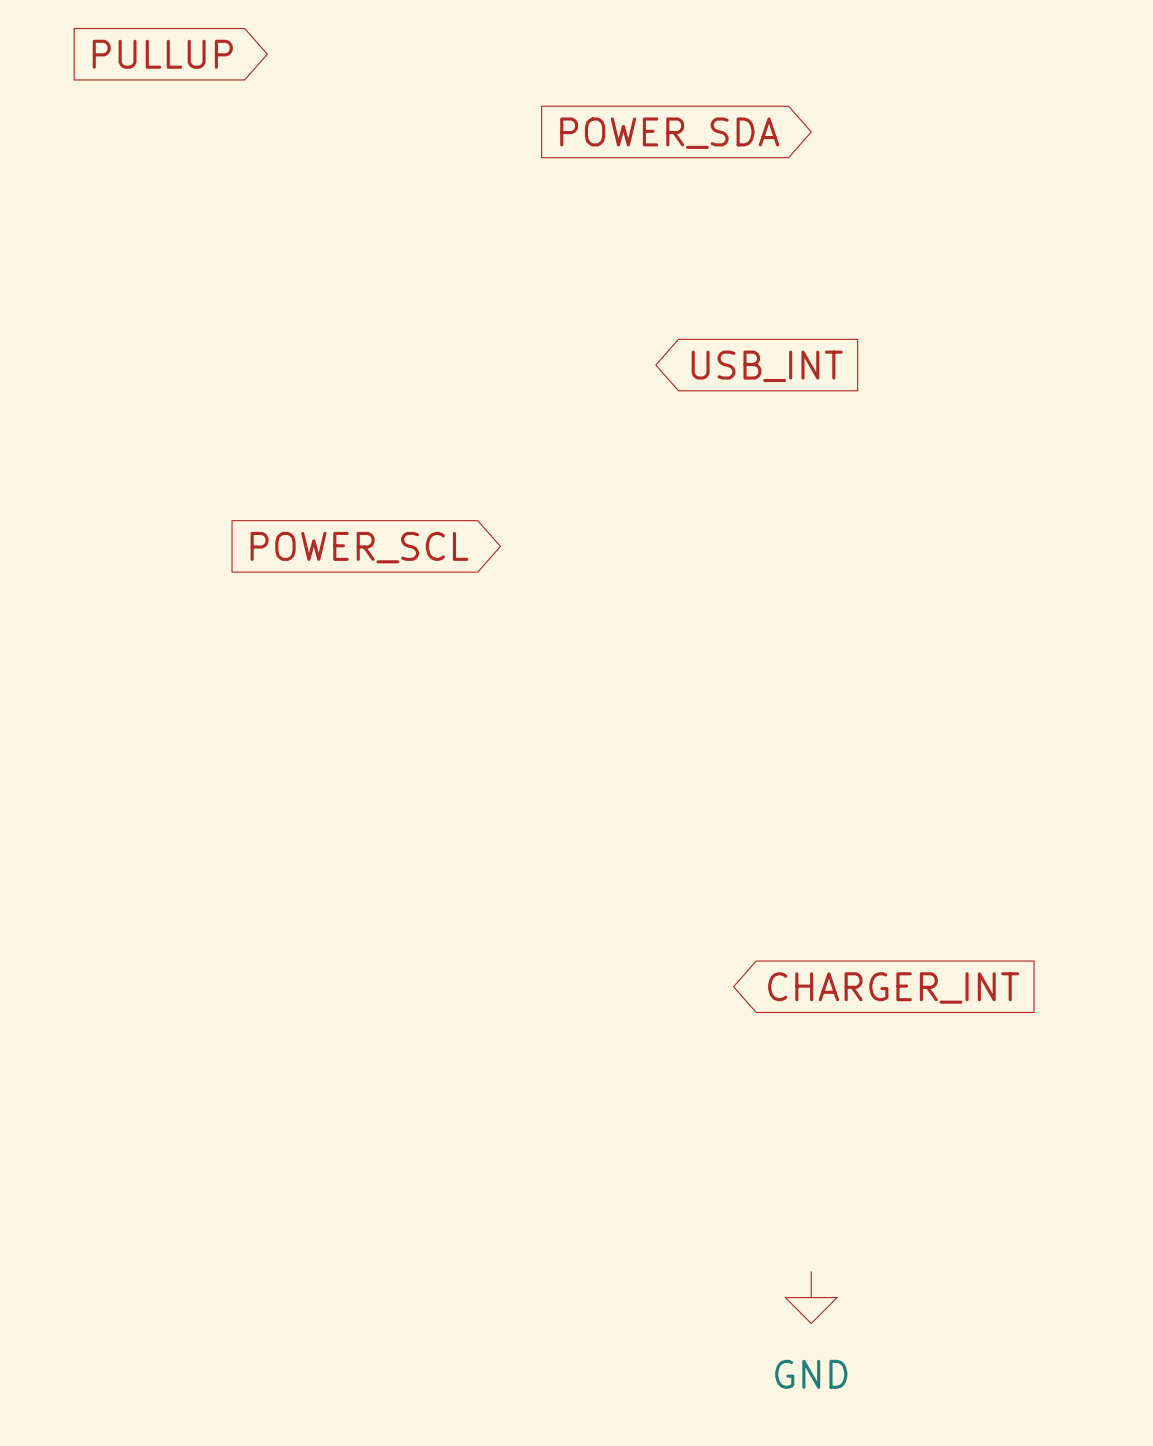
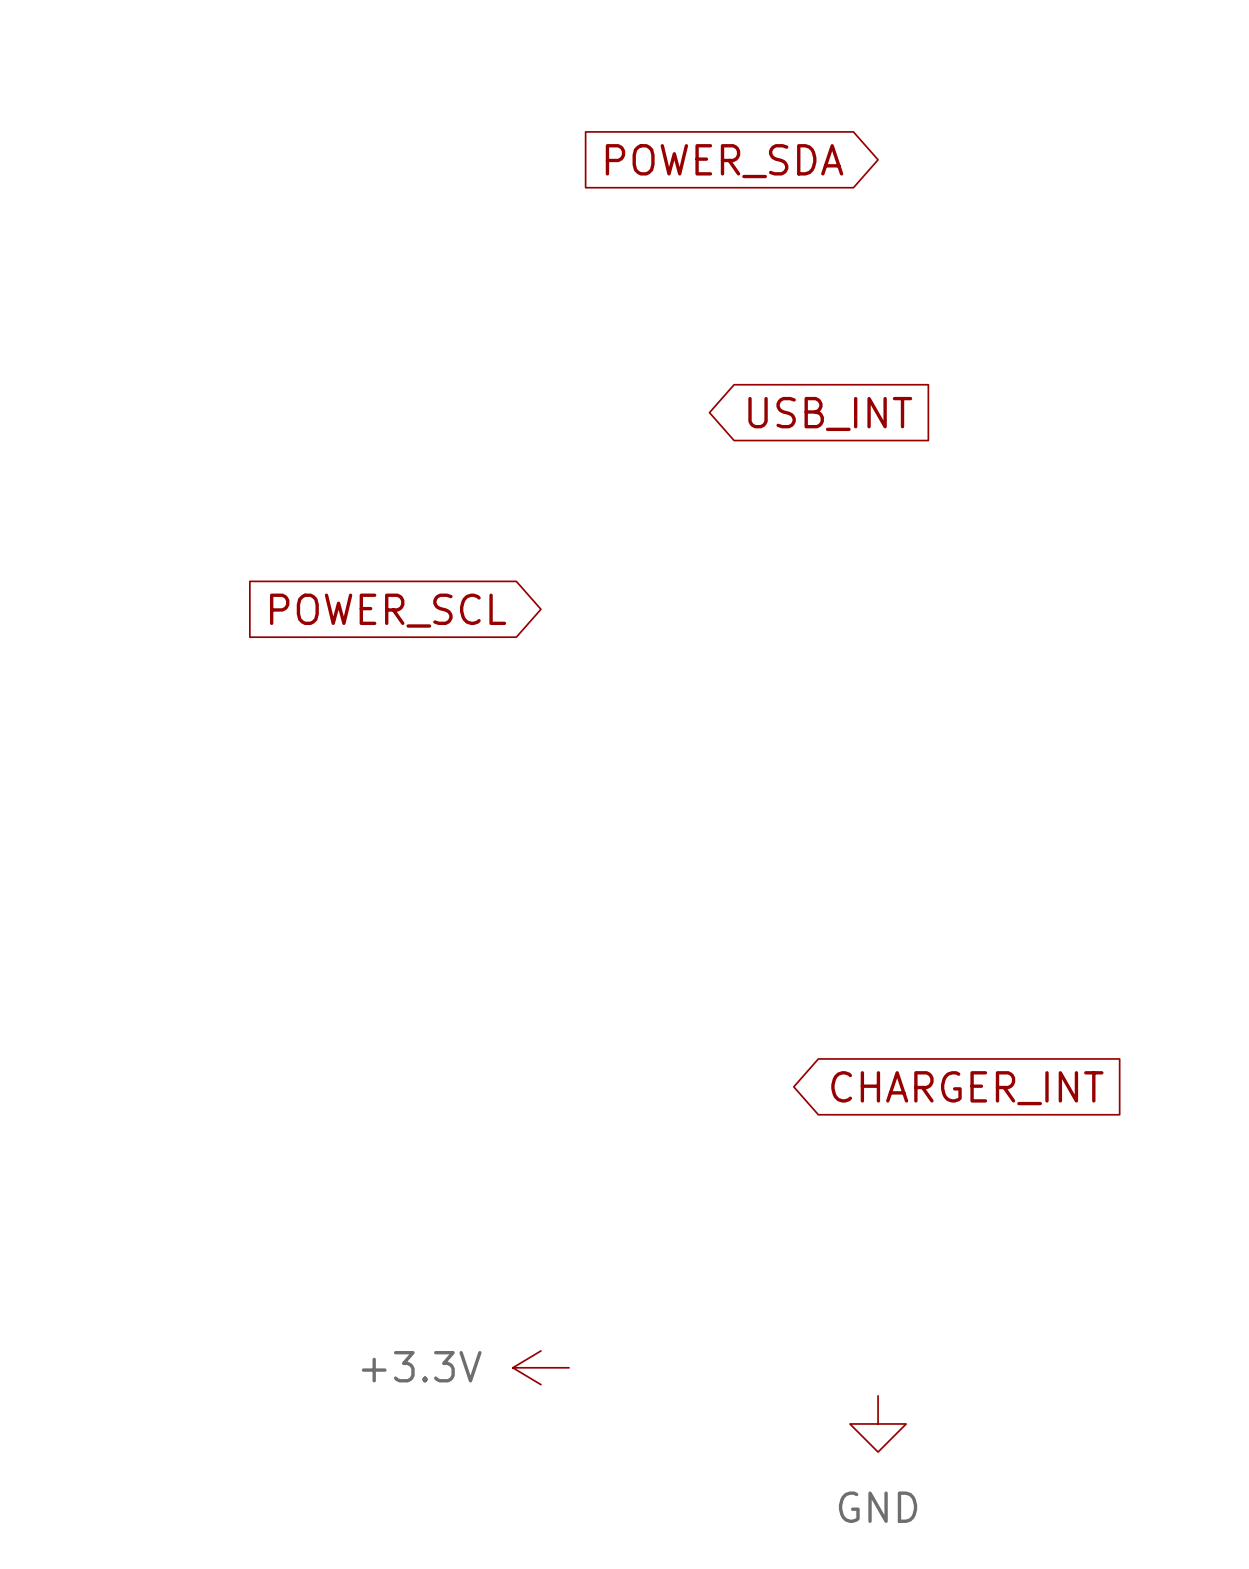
global label: PULLUP (162, 54) -> none
power symbol: none -> +3.3V (540, 1367)

